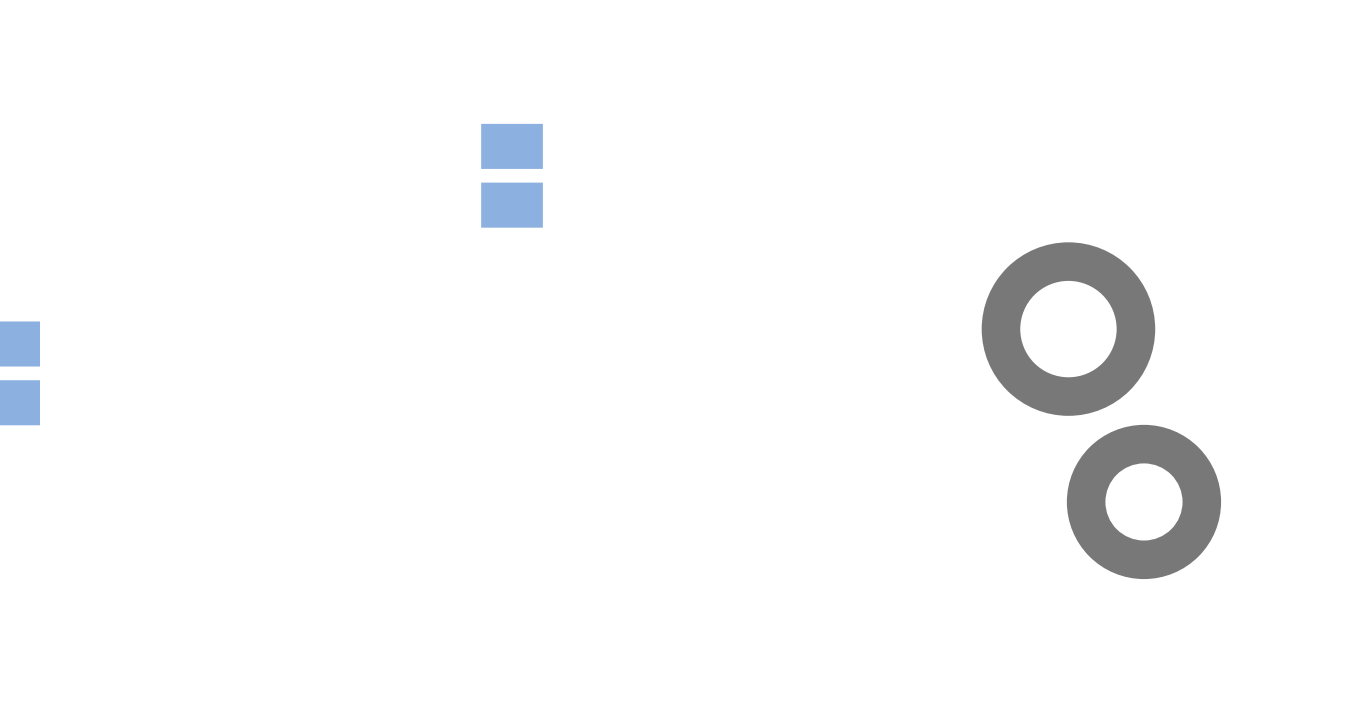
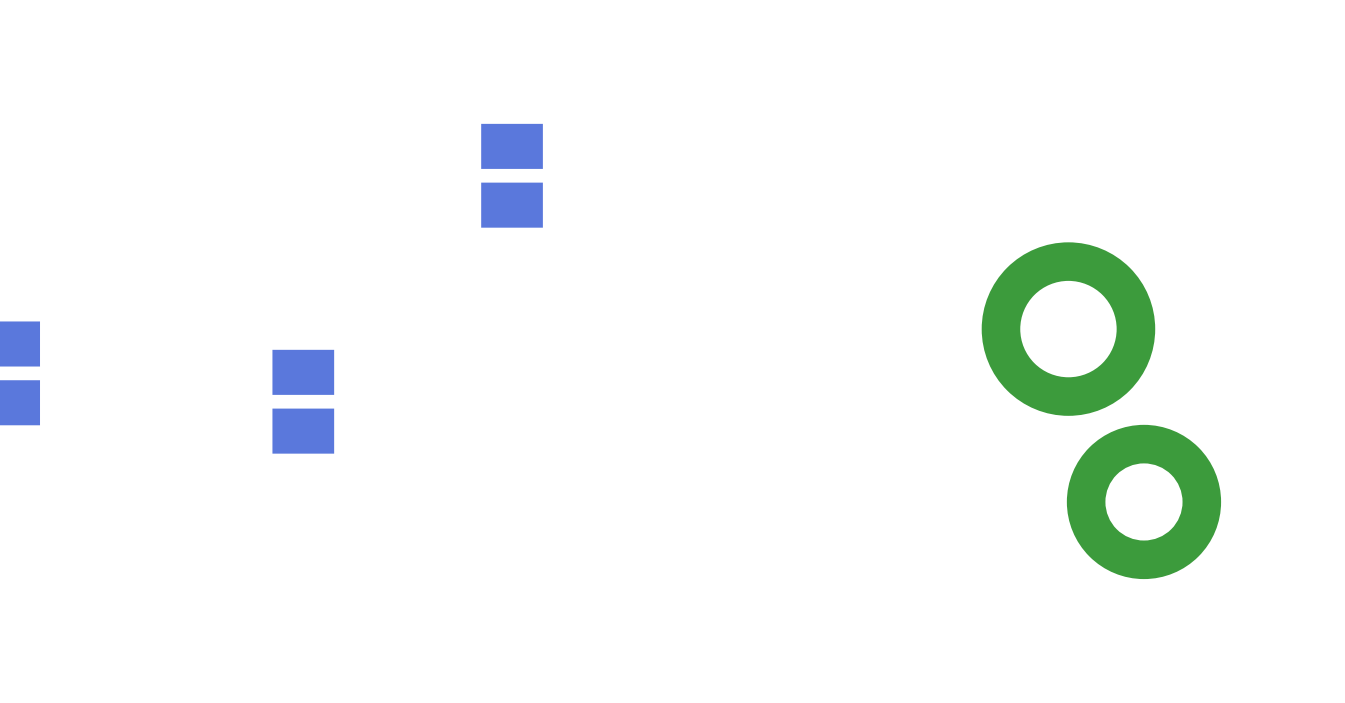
part: none -> (303, 401)

